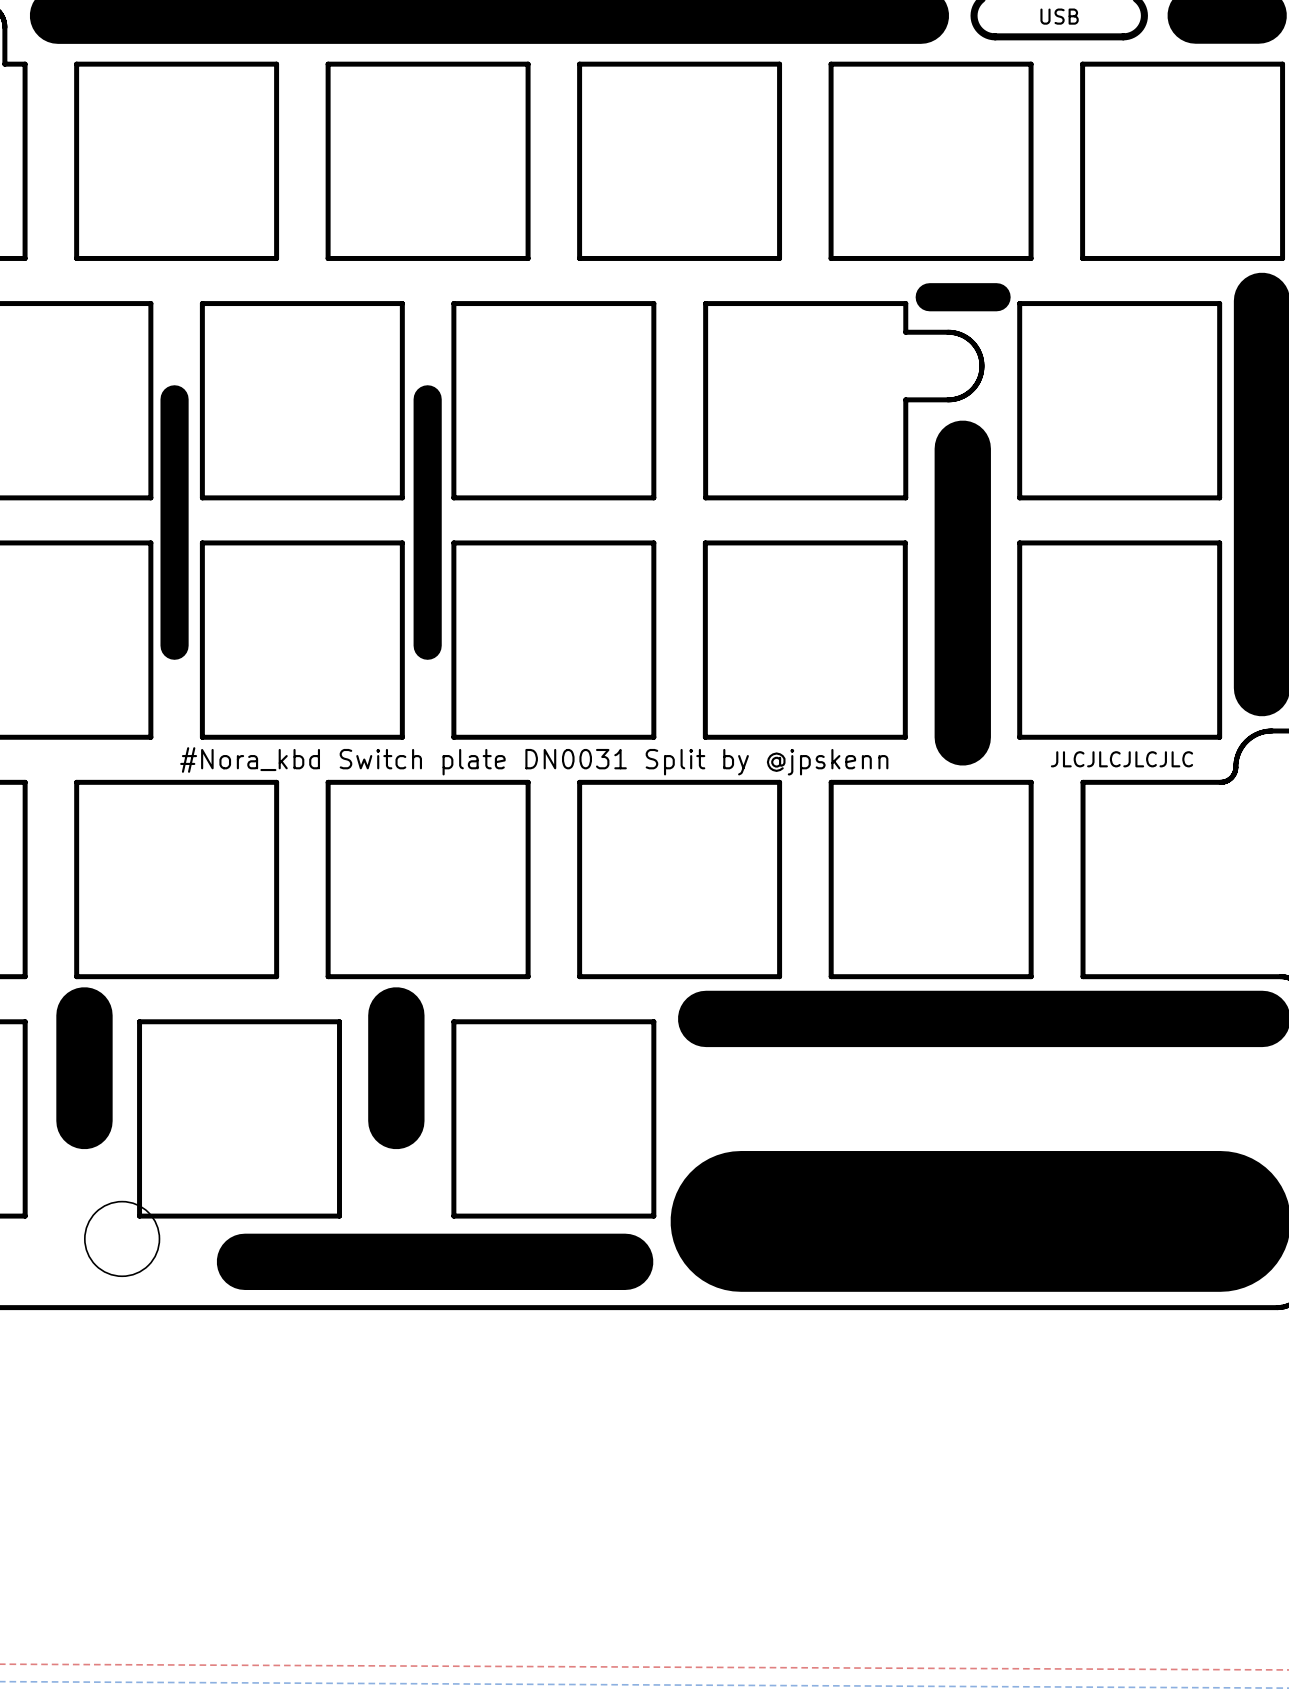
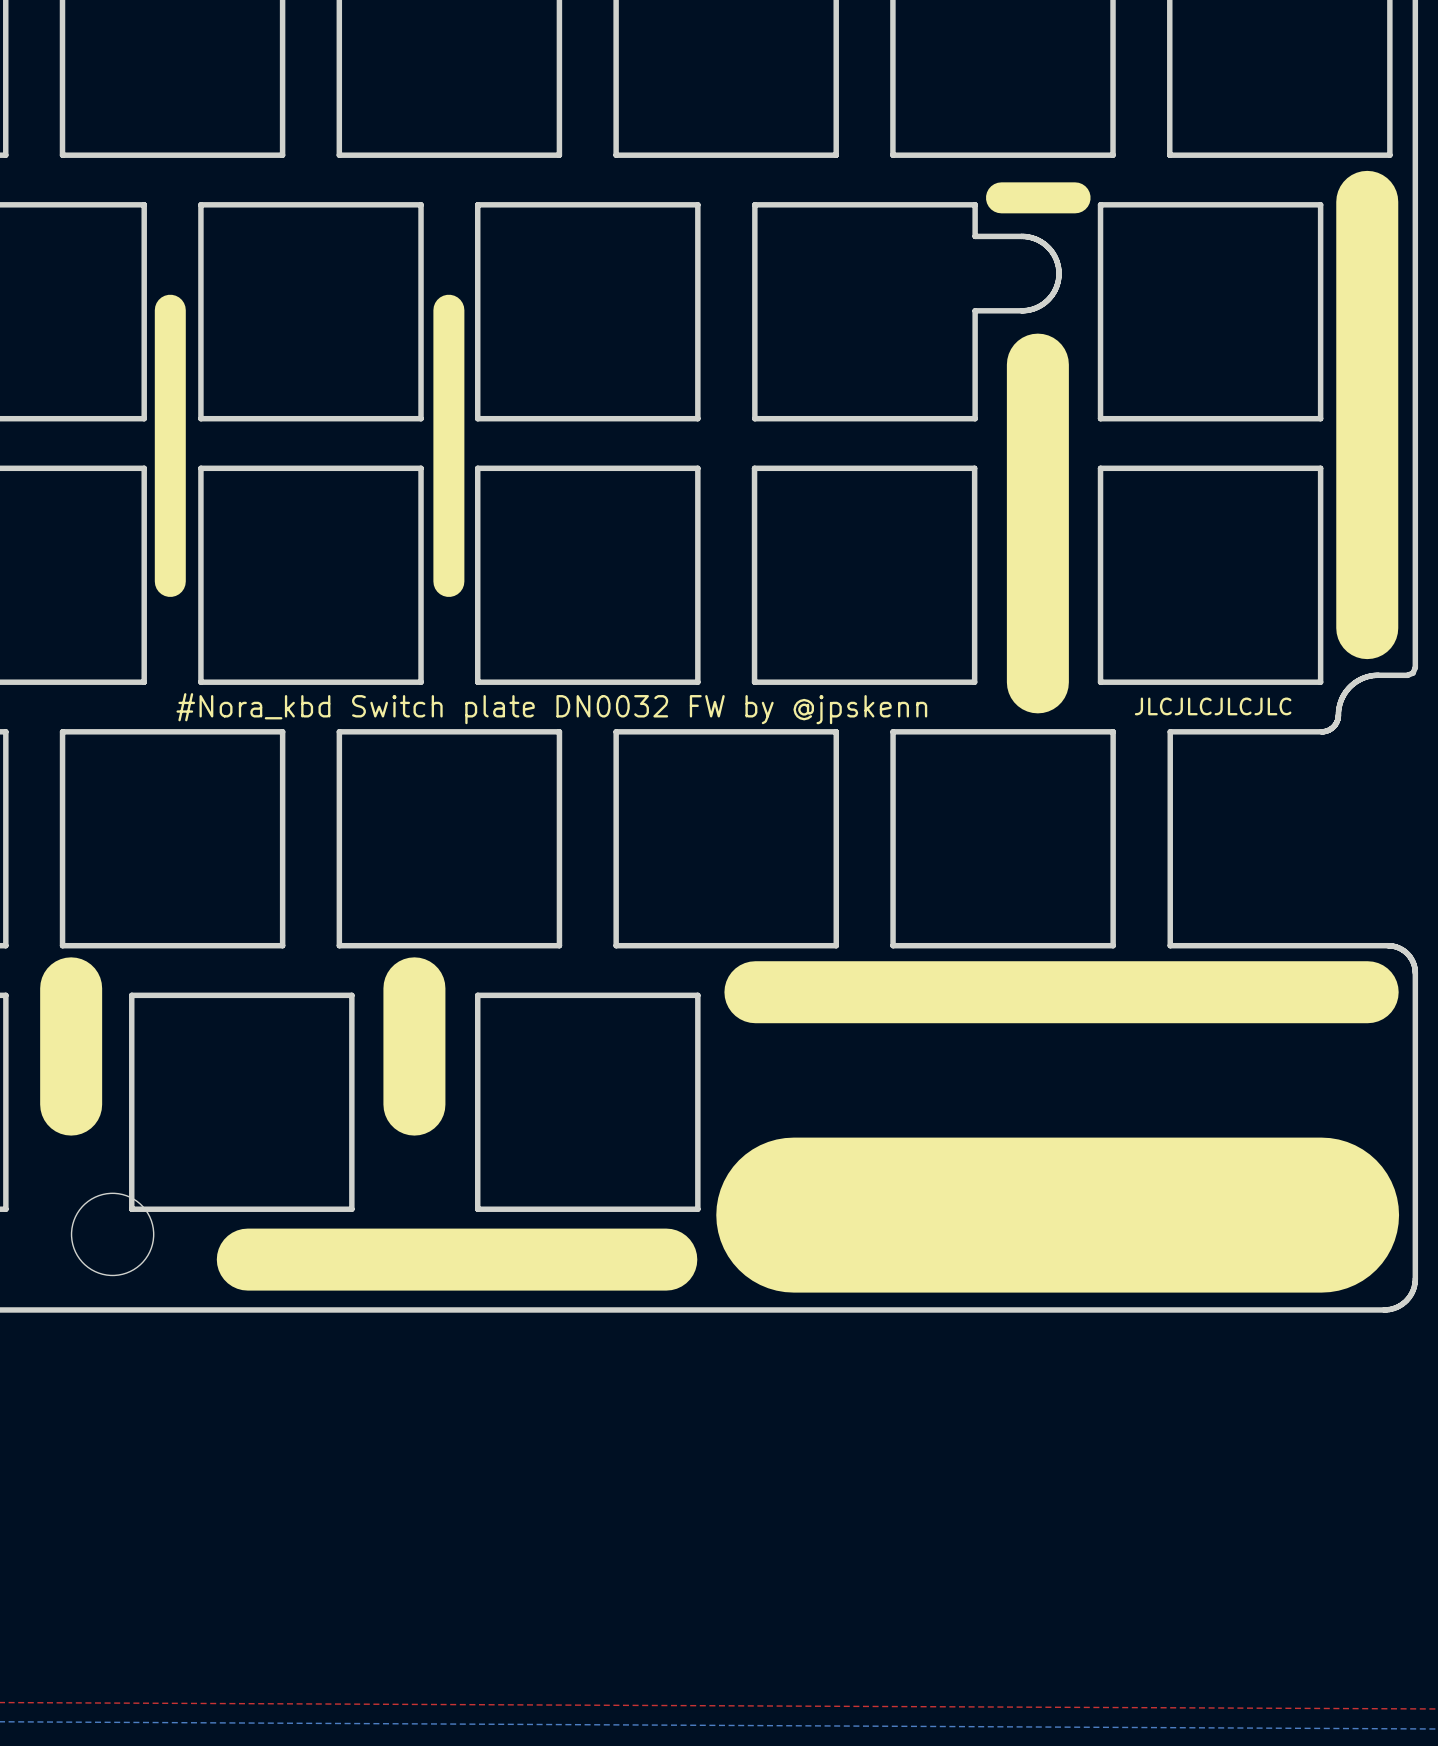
text: #Nora_kbd Switch plate DN0031 Split by @jpskenn (534, 761) -> #Nora_kbd Switch plate DN0032 FW by @jpskenn (551, 708)

